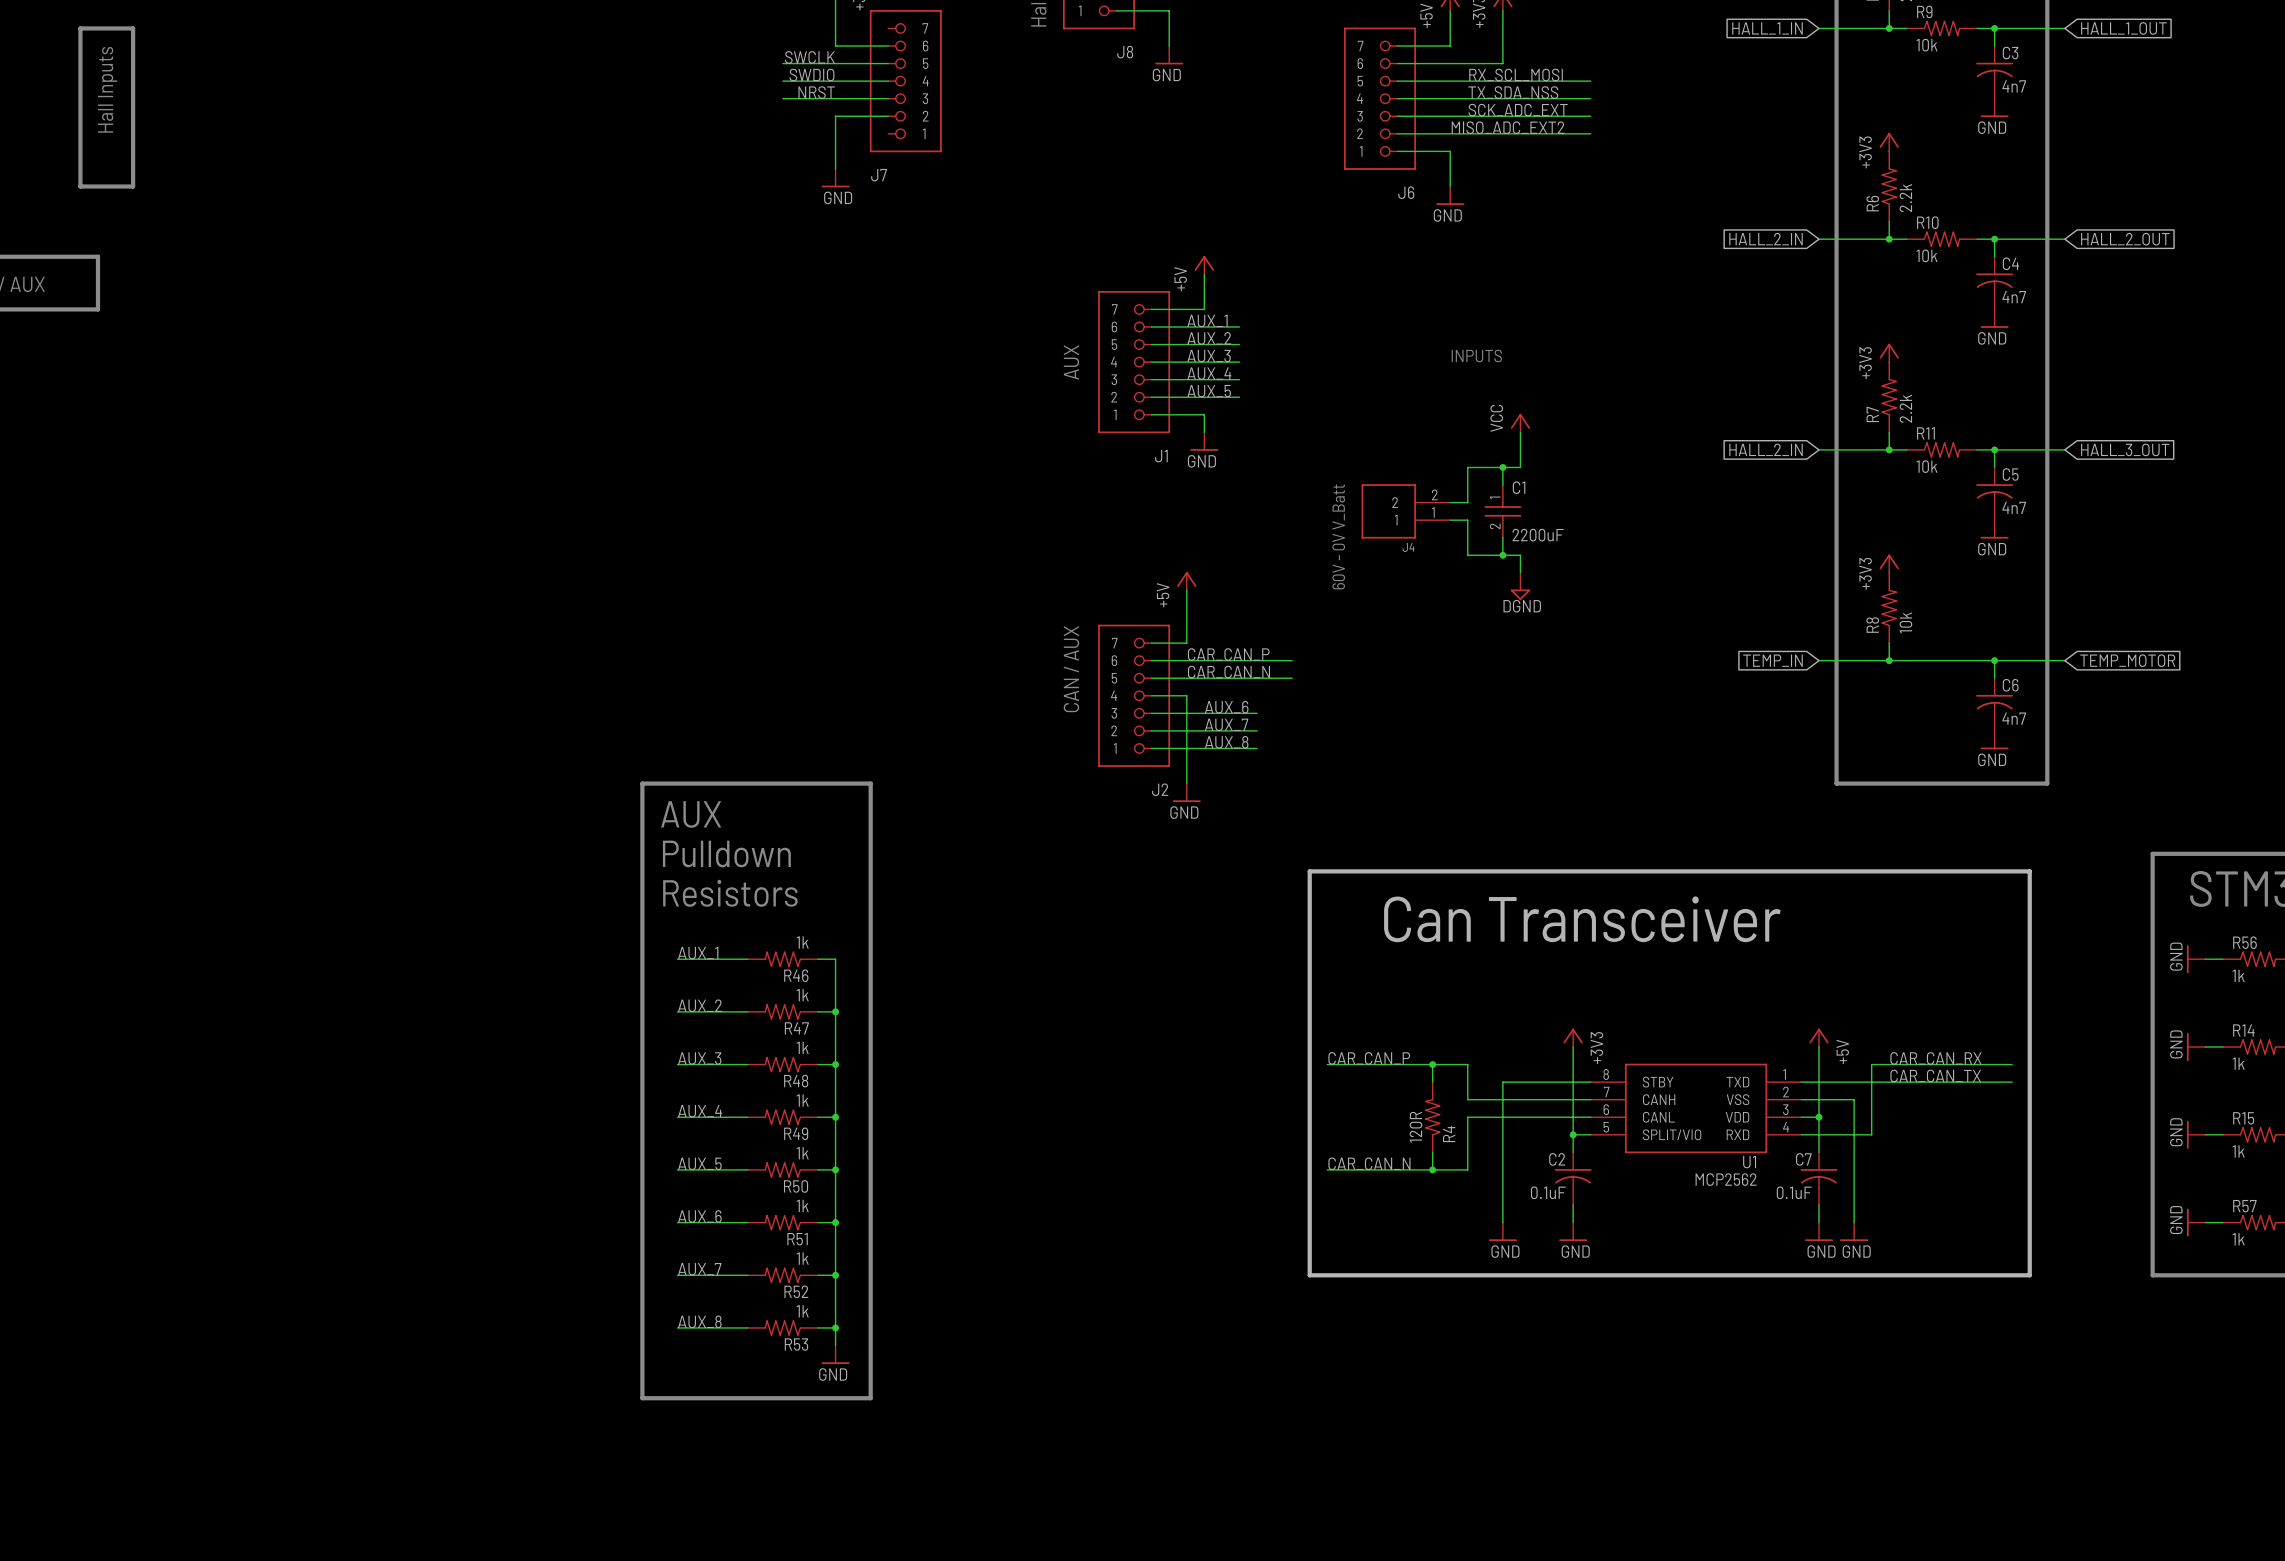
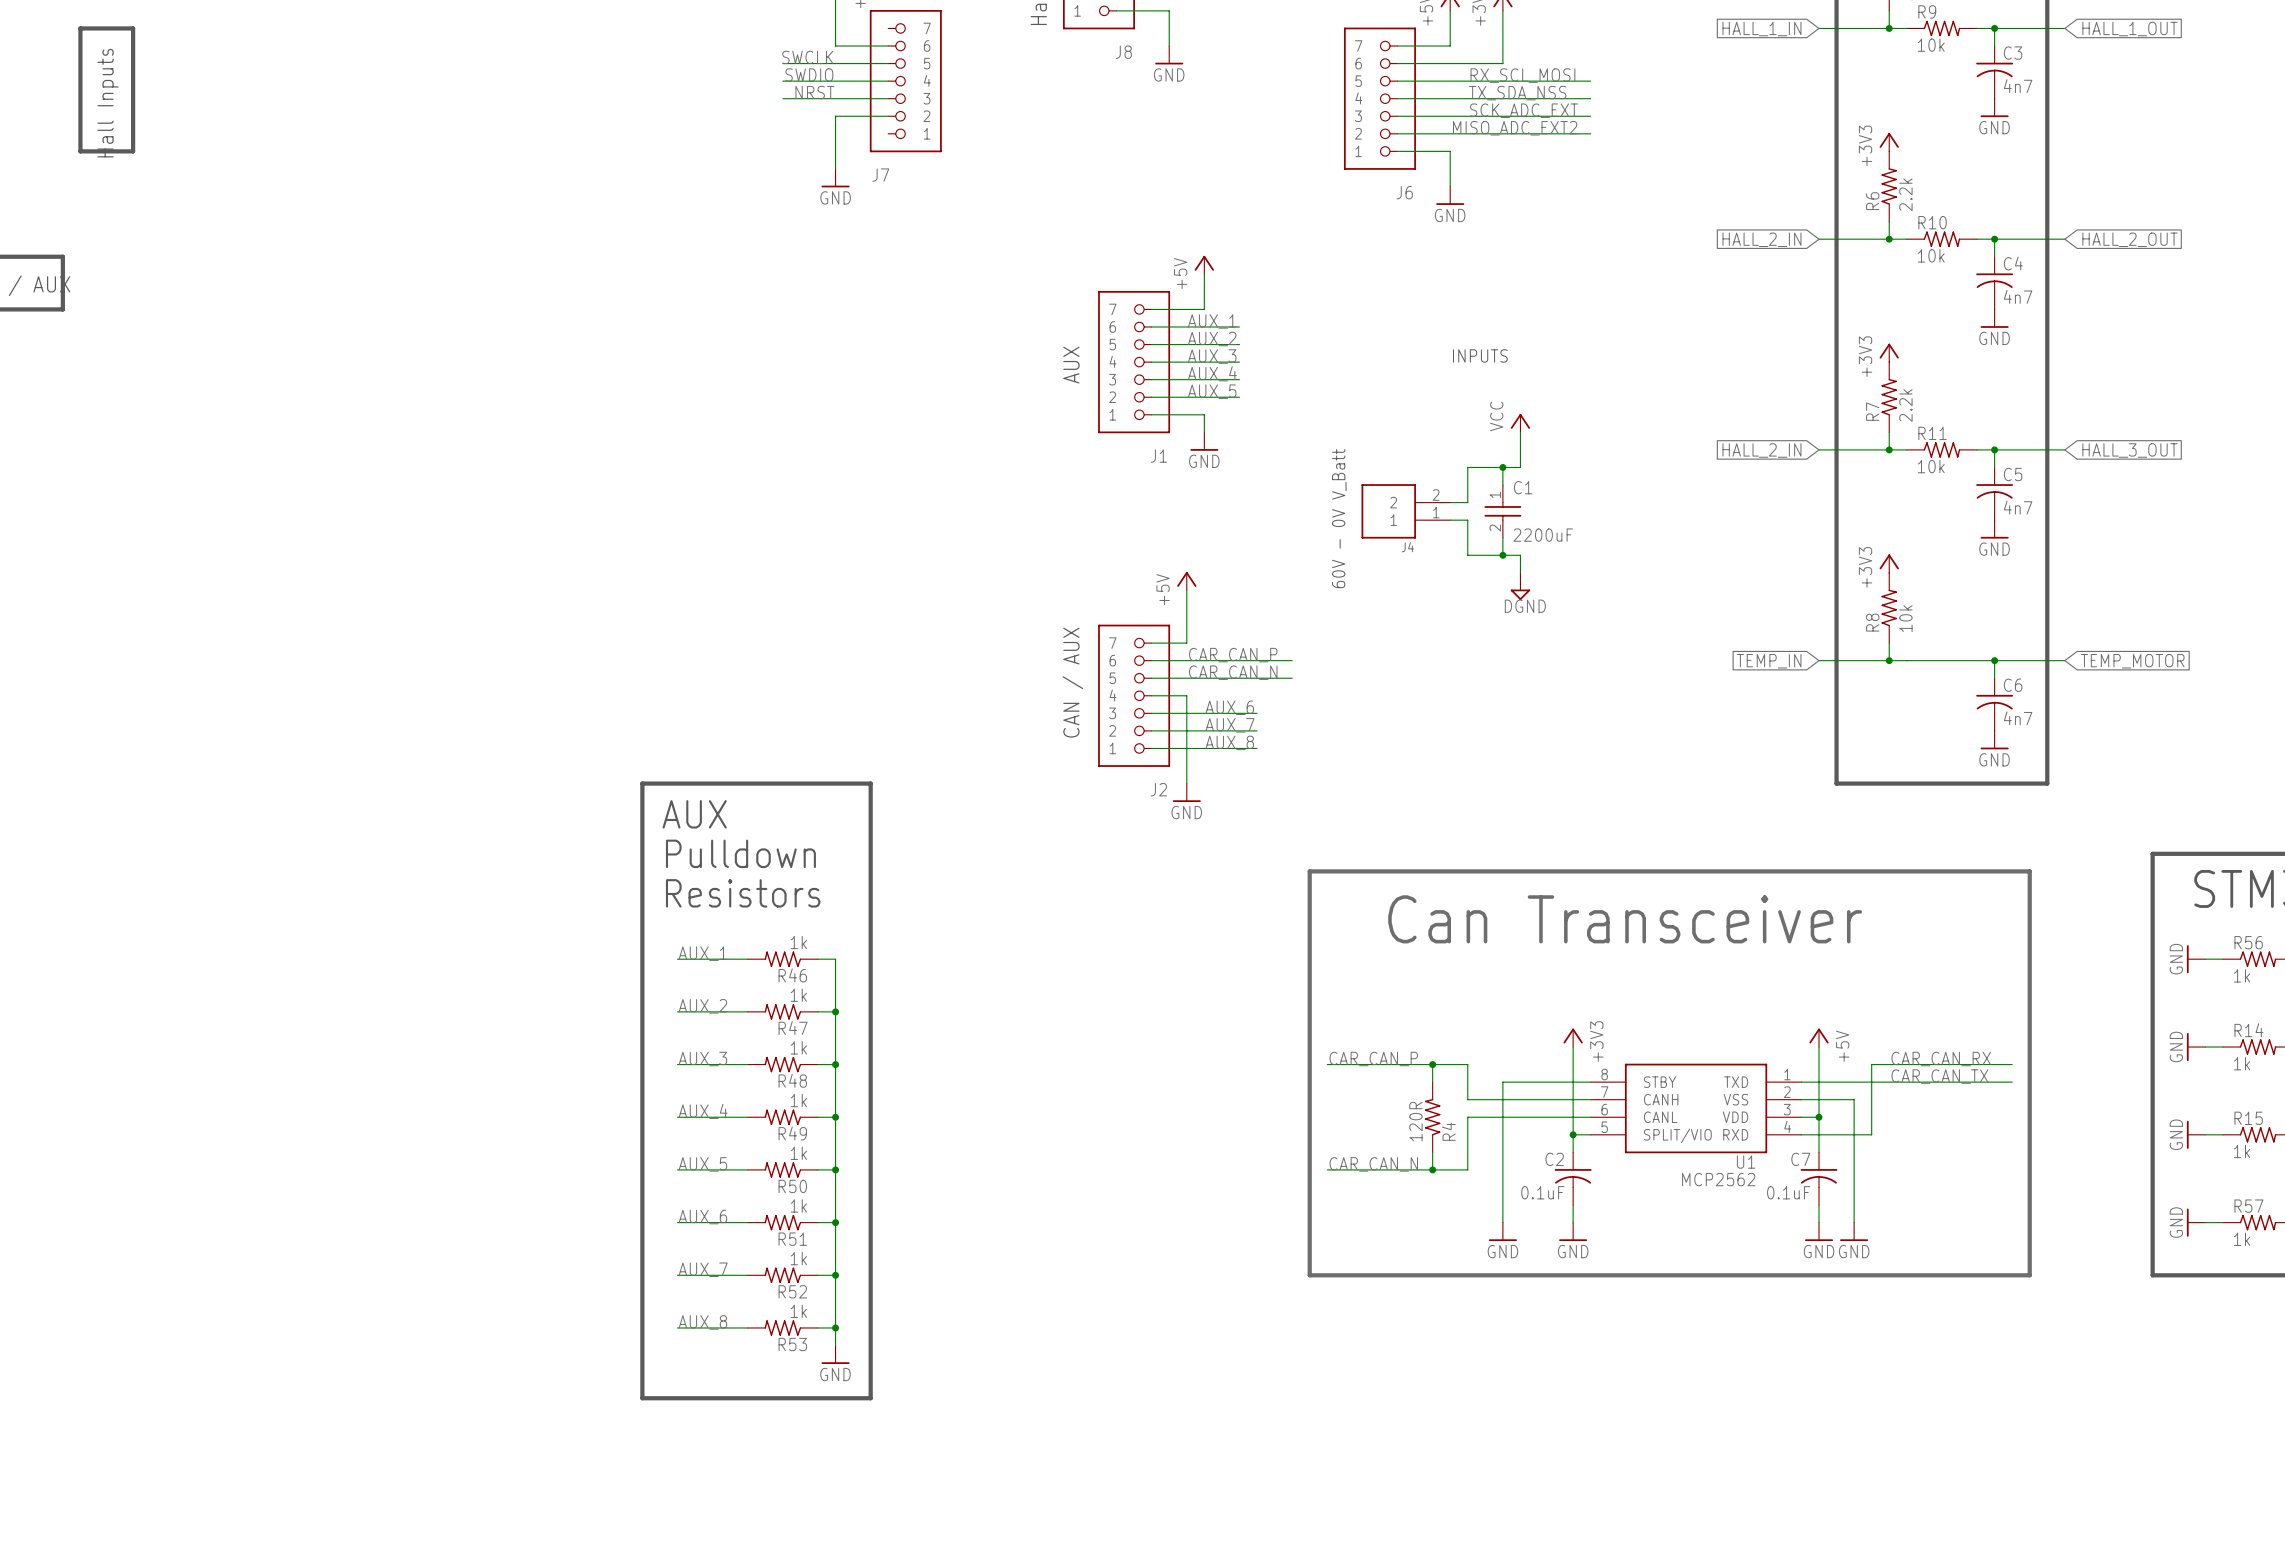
line: (80, 151) (80, 186) (133, 186) (133, 151) -> (80, 151) (133, 151)
line: (62, 256) (97, 256) (97, 309) (62, 309) -> (62, 256) (62, 309)

